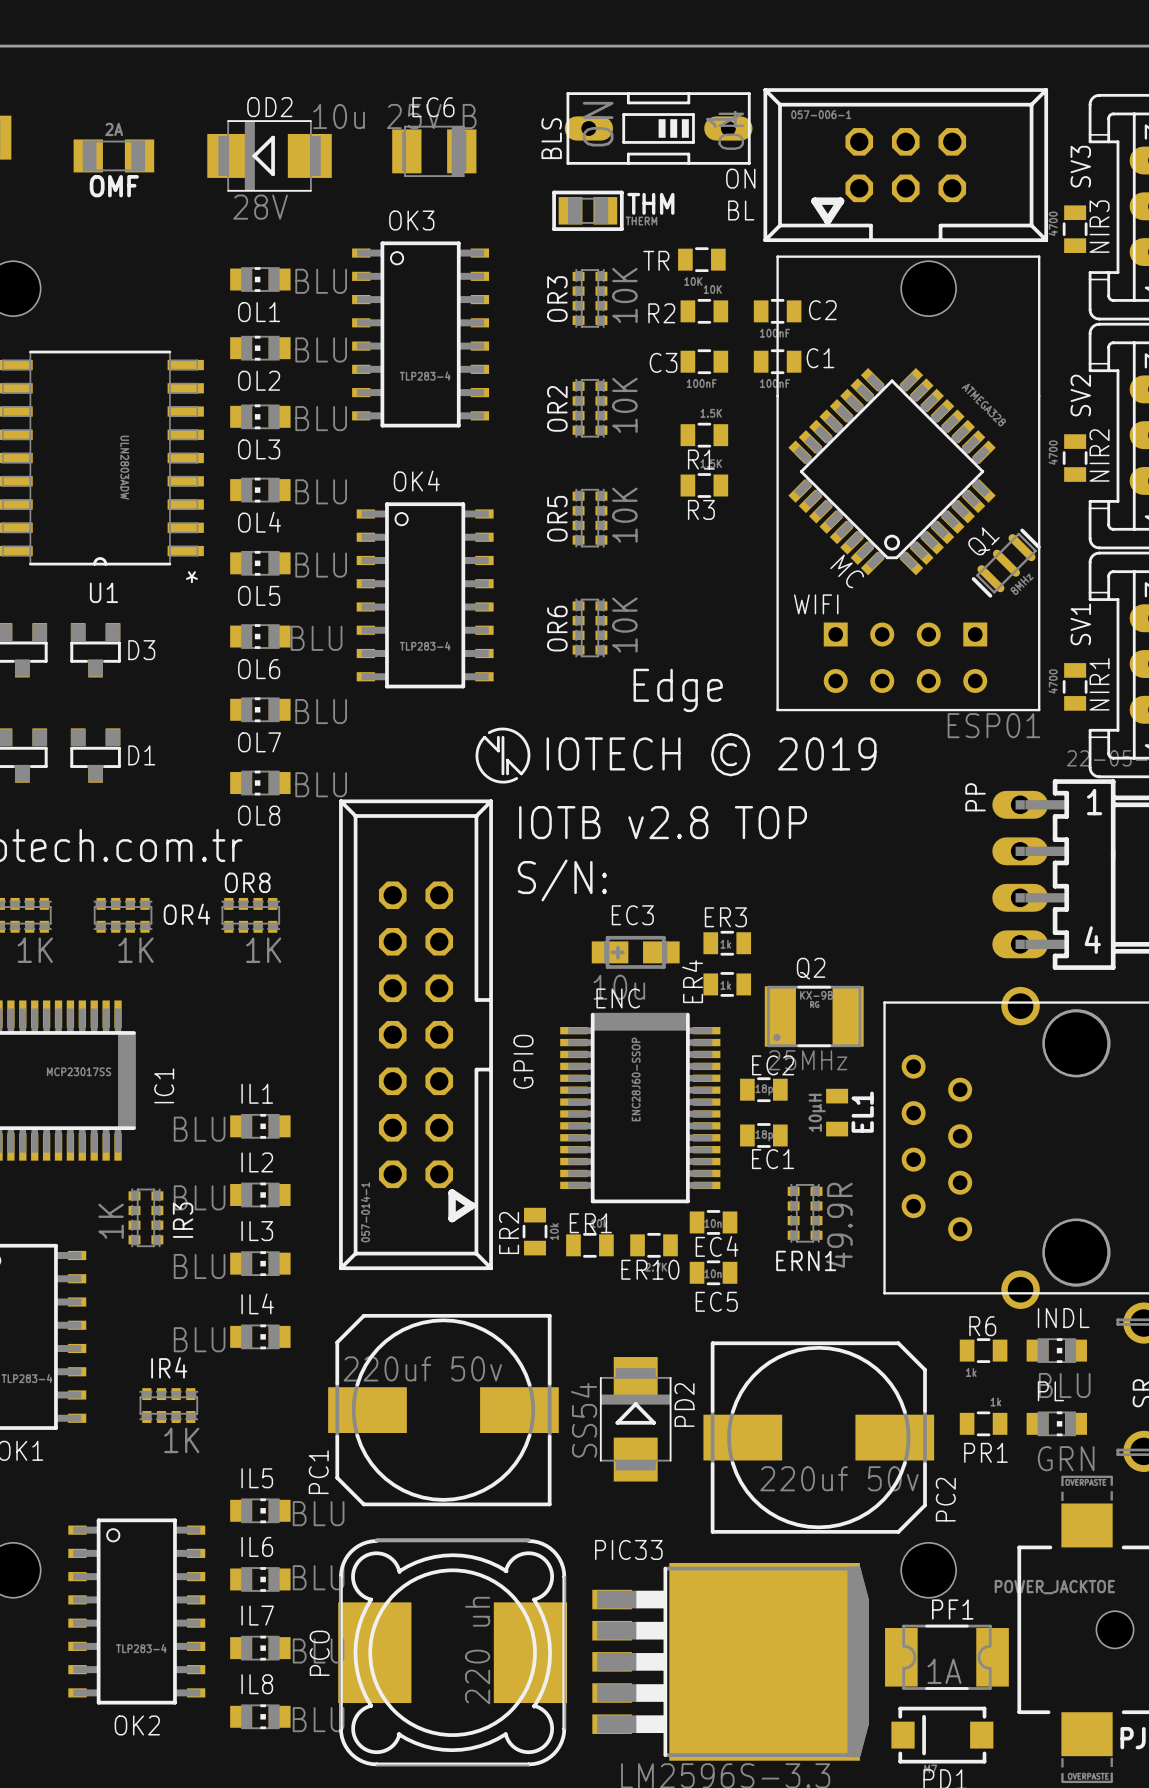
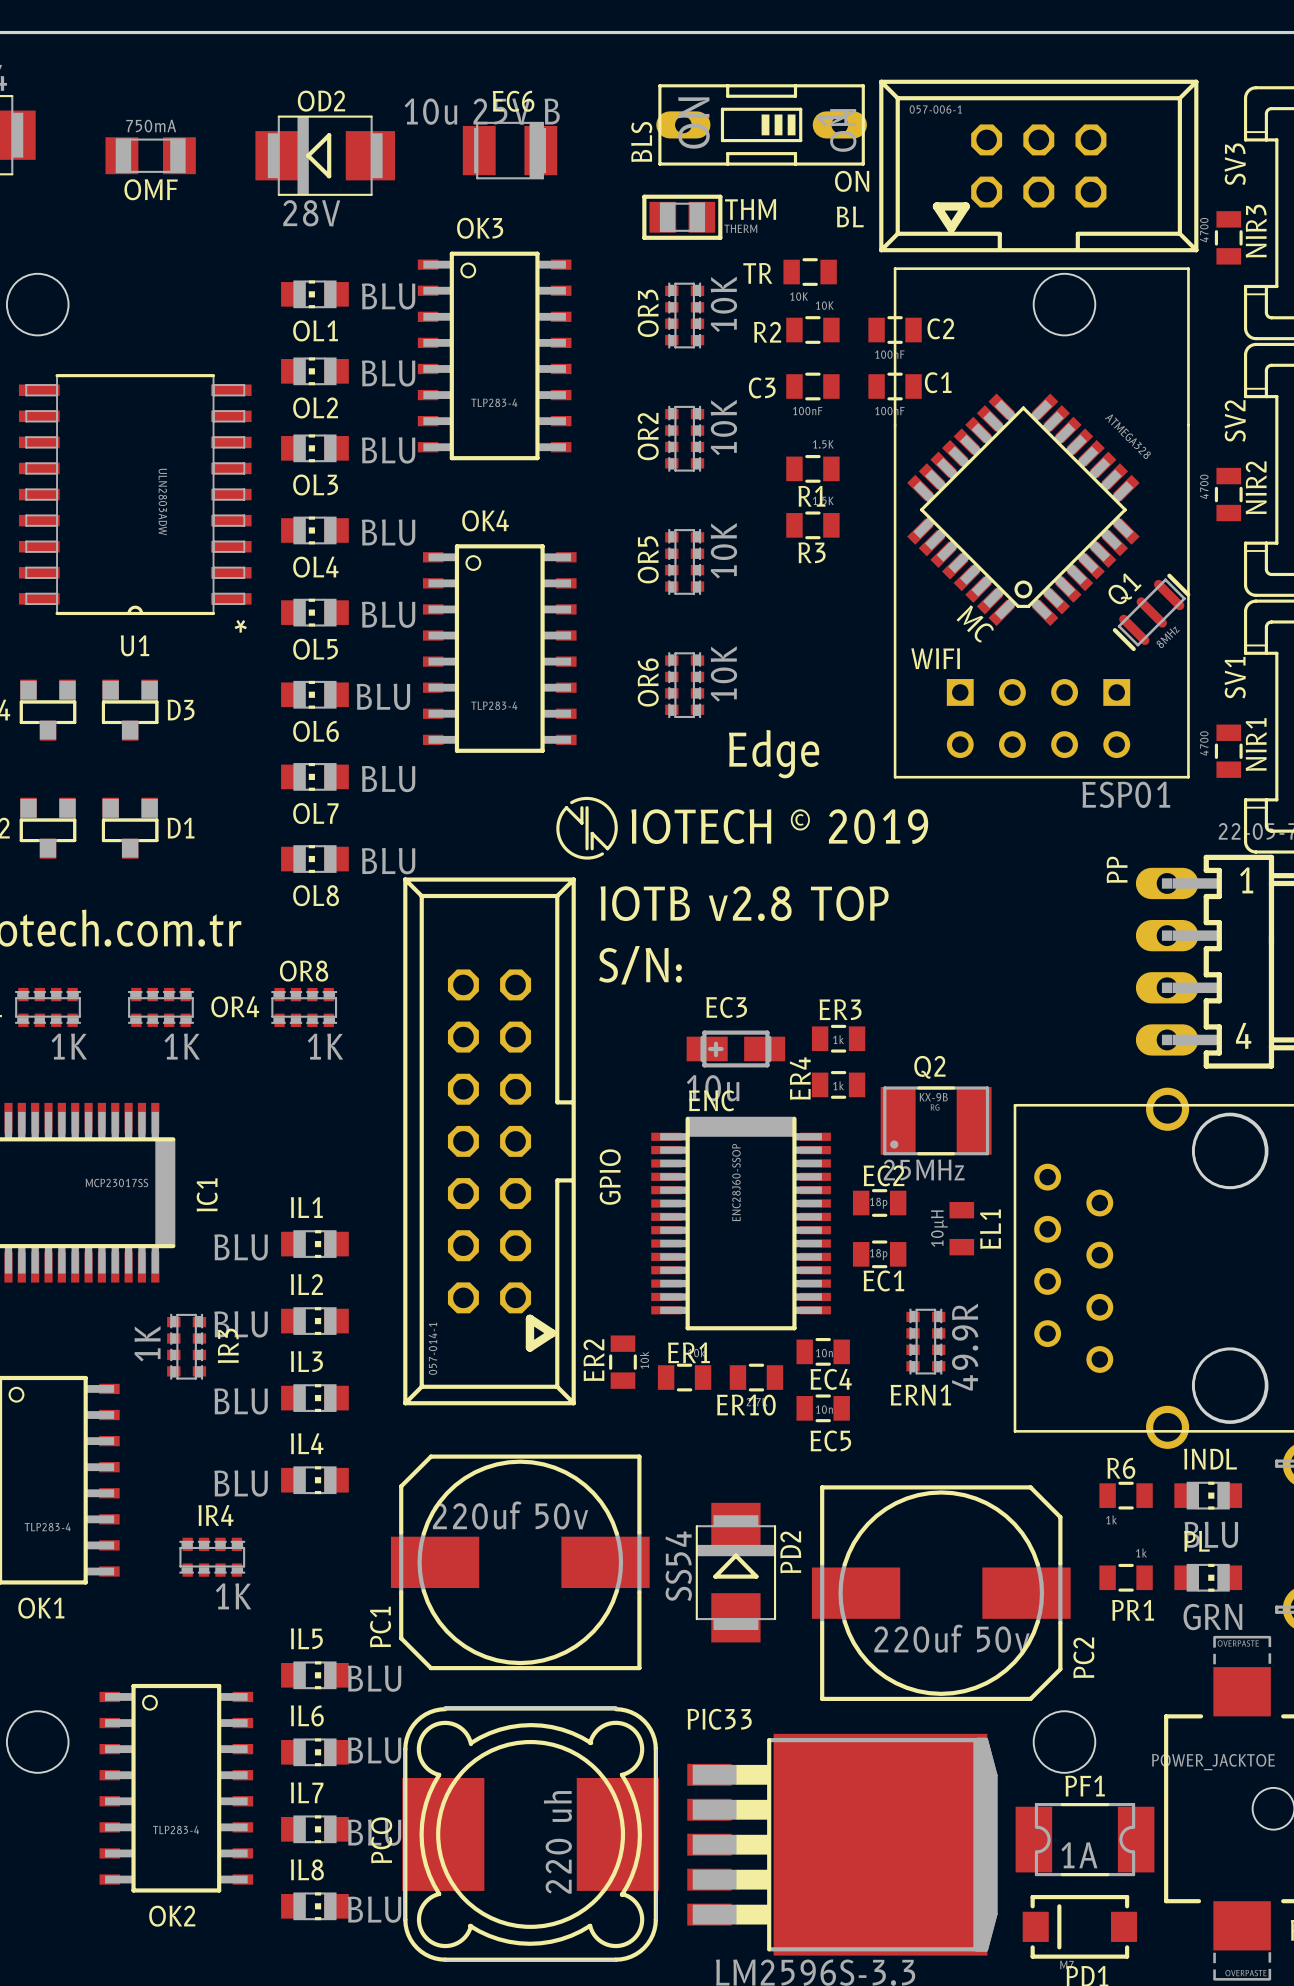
OMF value: 2A (114, 129) -> 750mA (151, 126)

